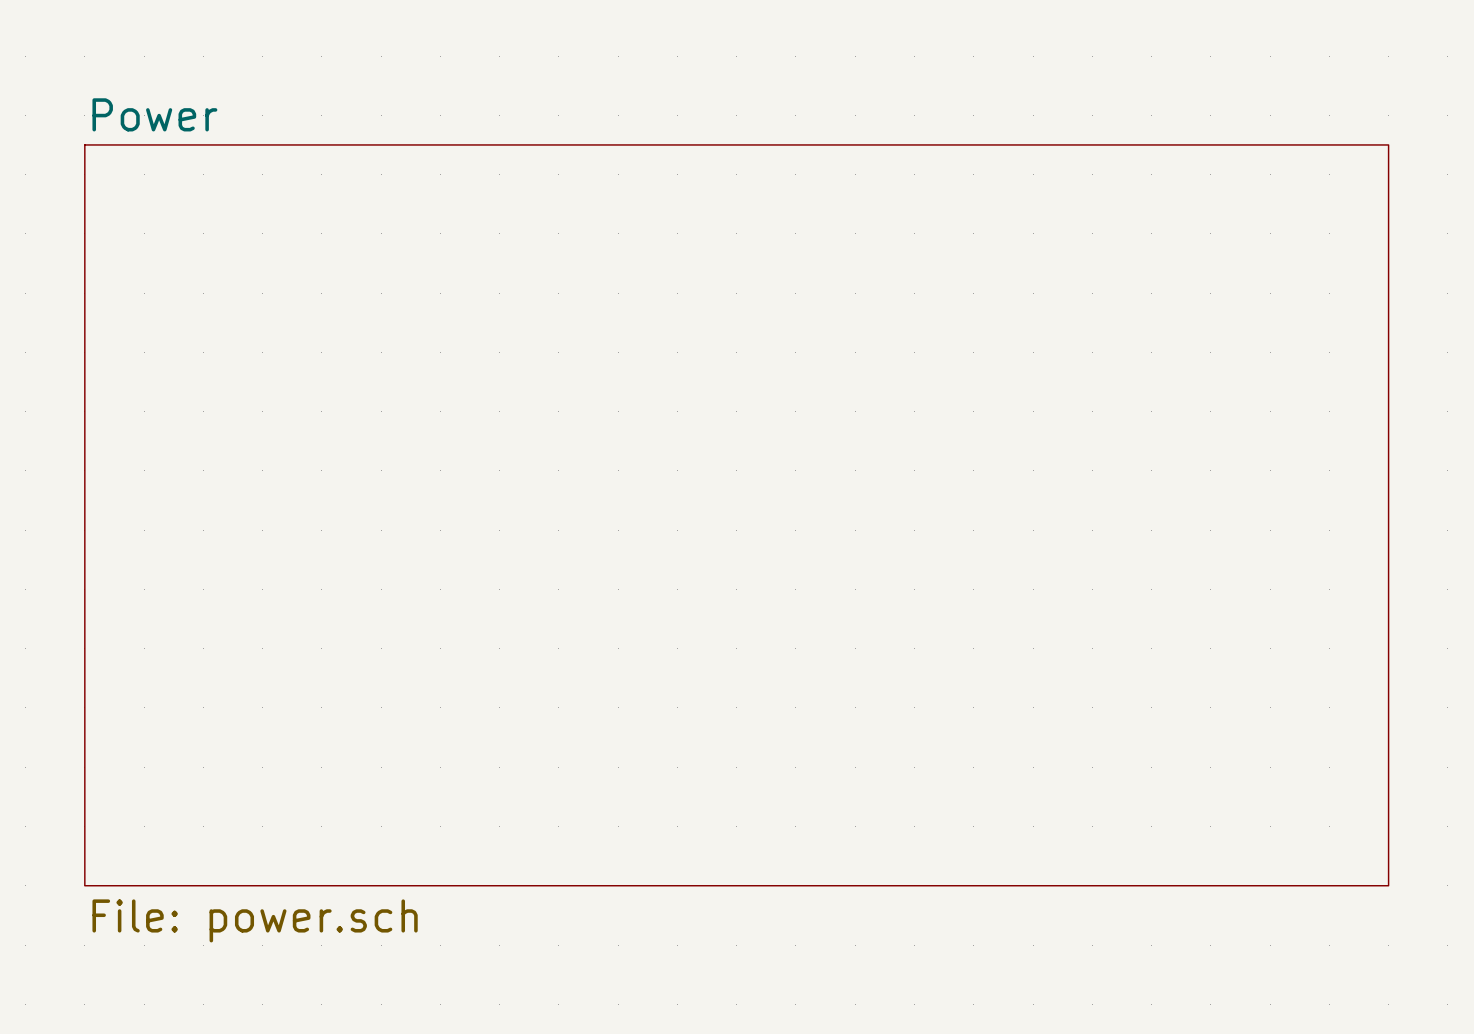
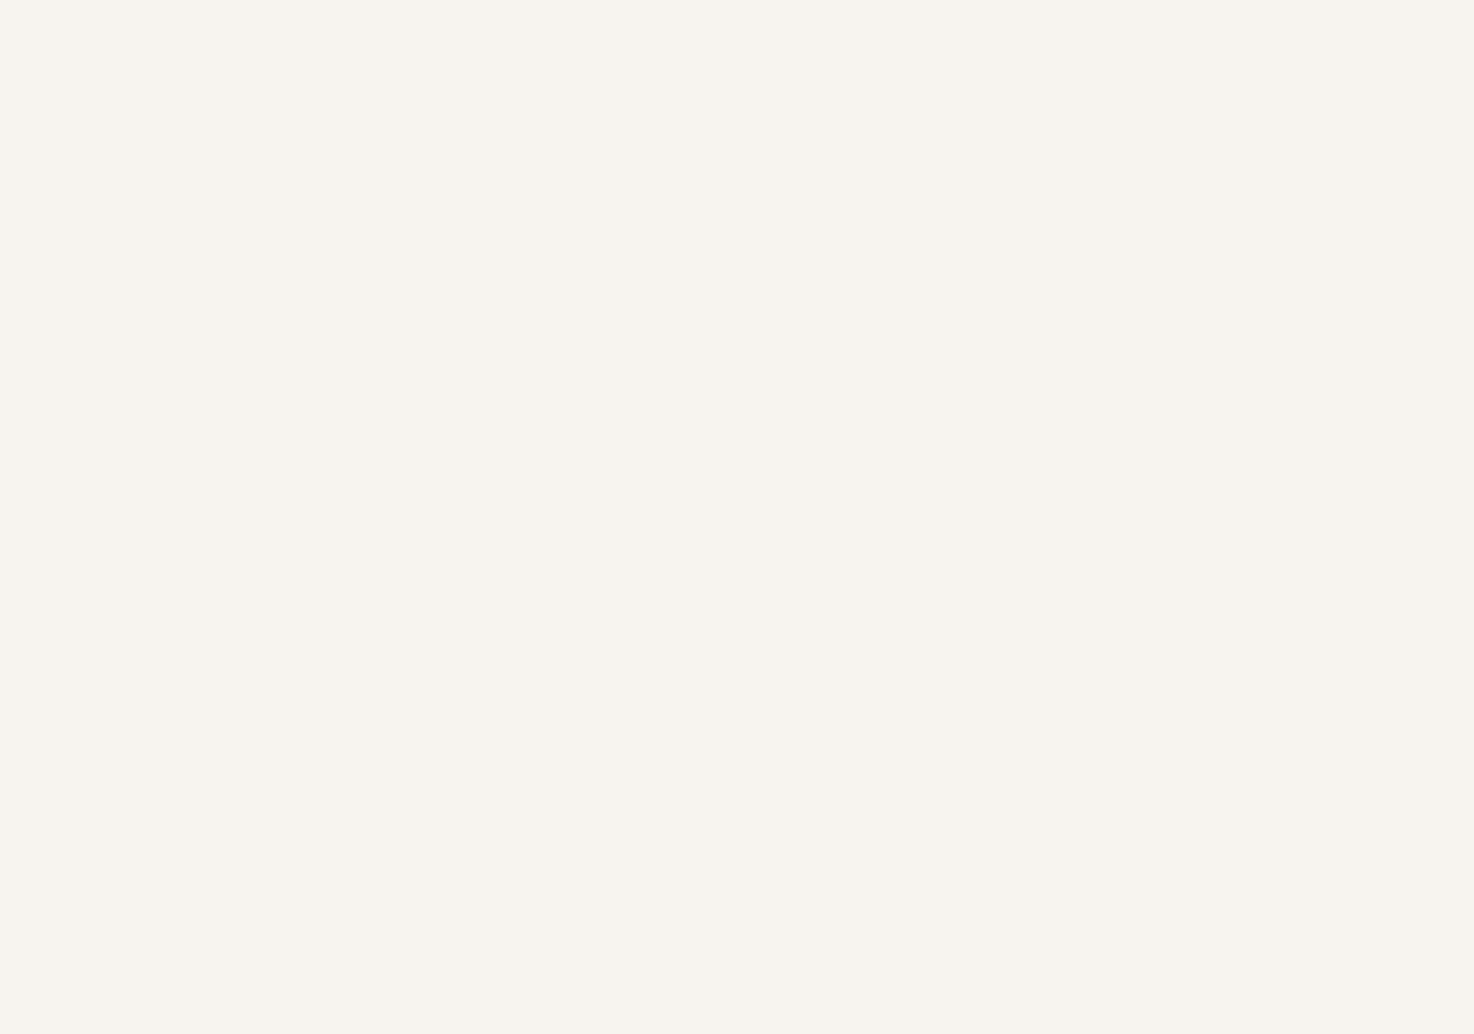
sheet Power: File: power.sch (736, 515) -> none

